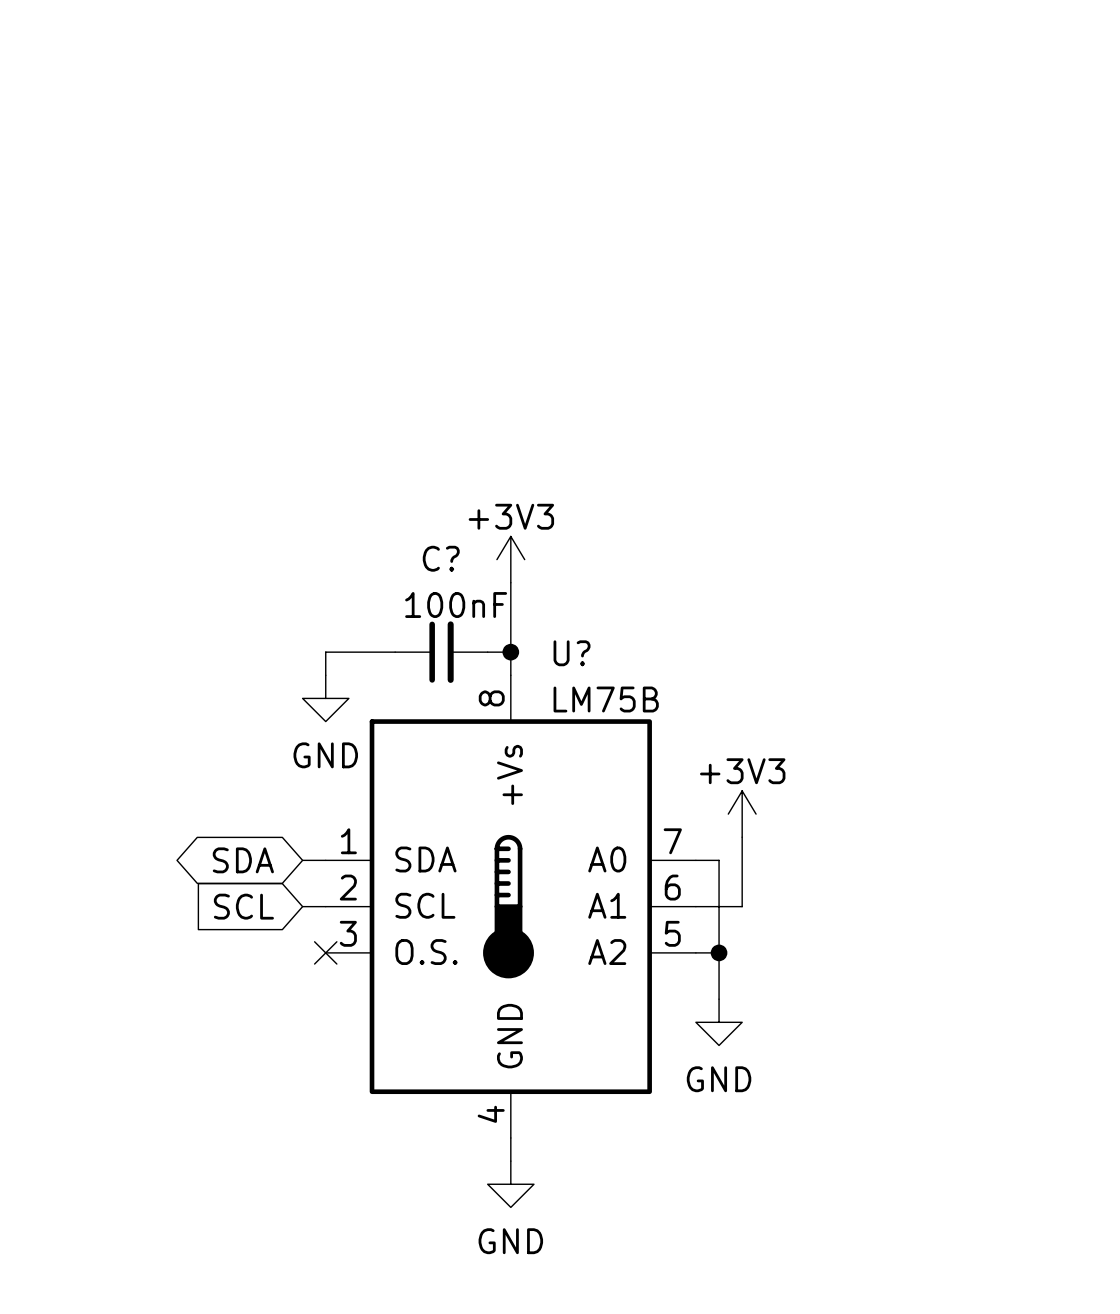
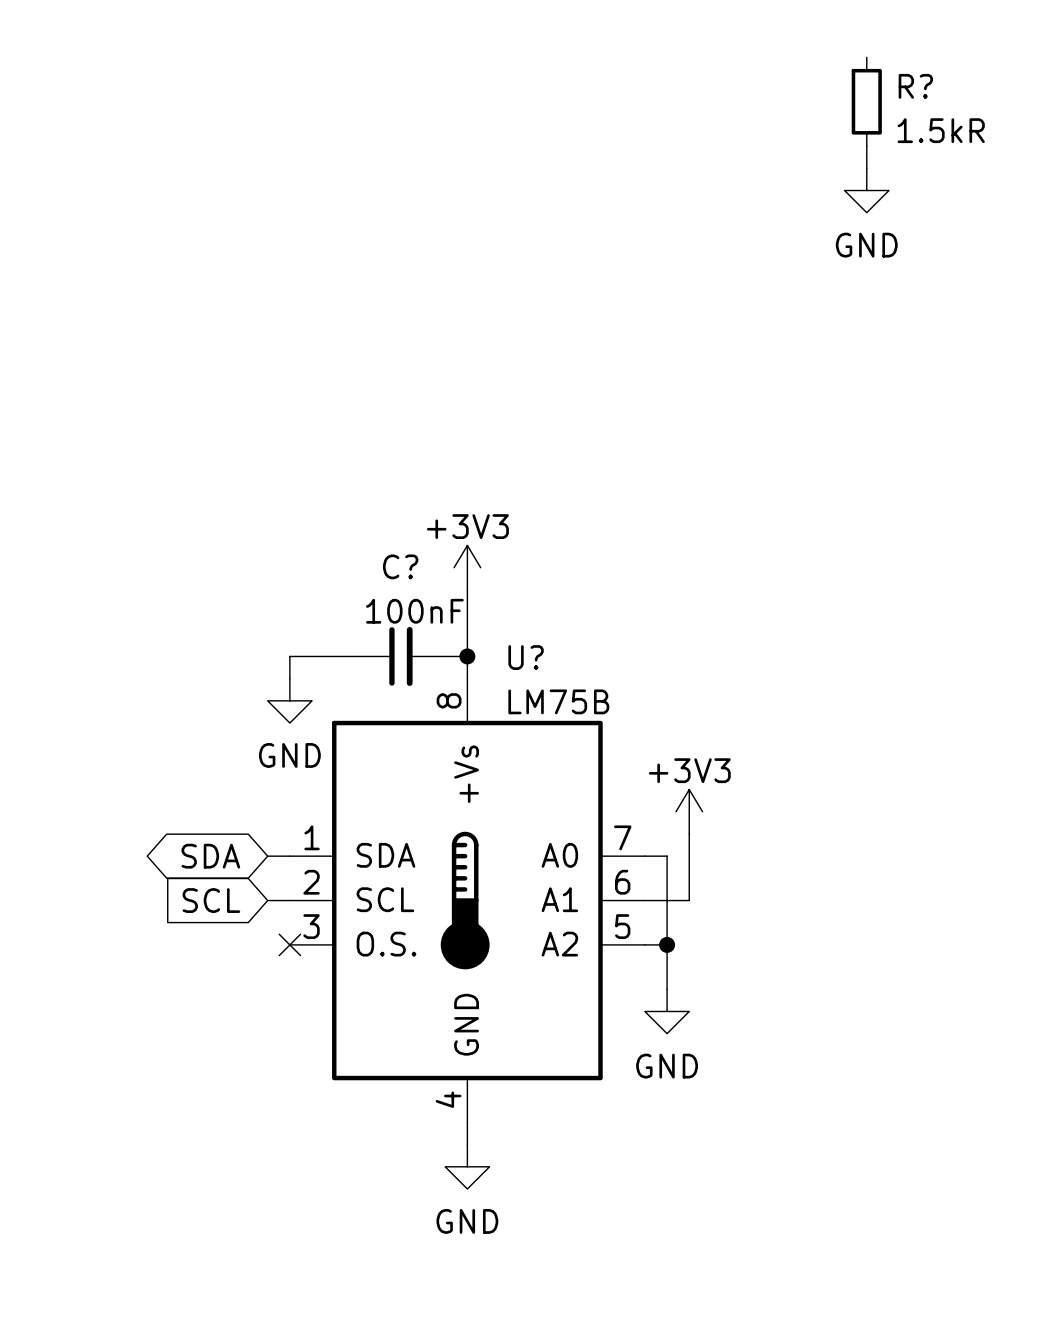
R?: none -> 1.5kR (866, 101)
wire: none -> (866, 146) (866, 168)
power symbol: none -> GND (866, 190)

